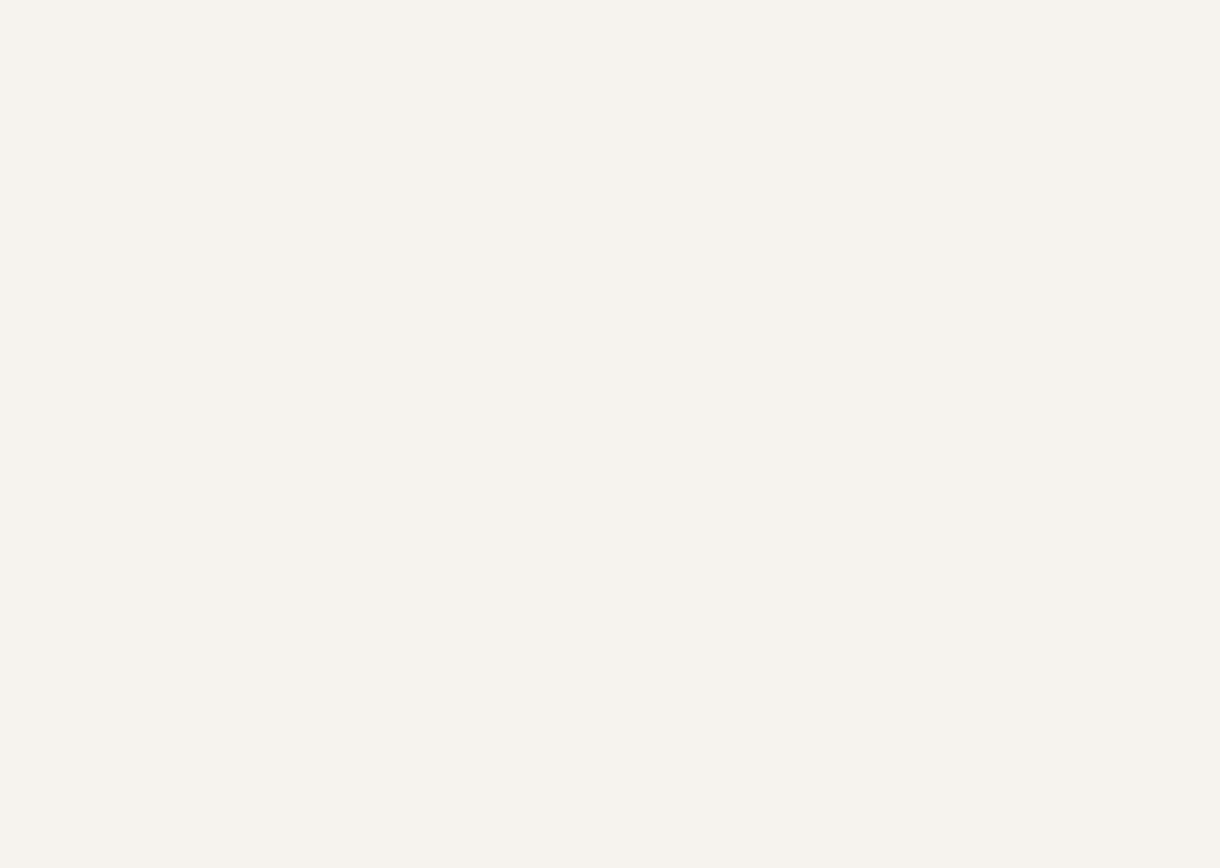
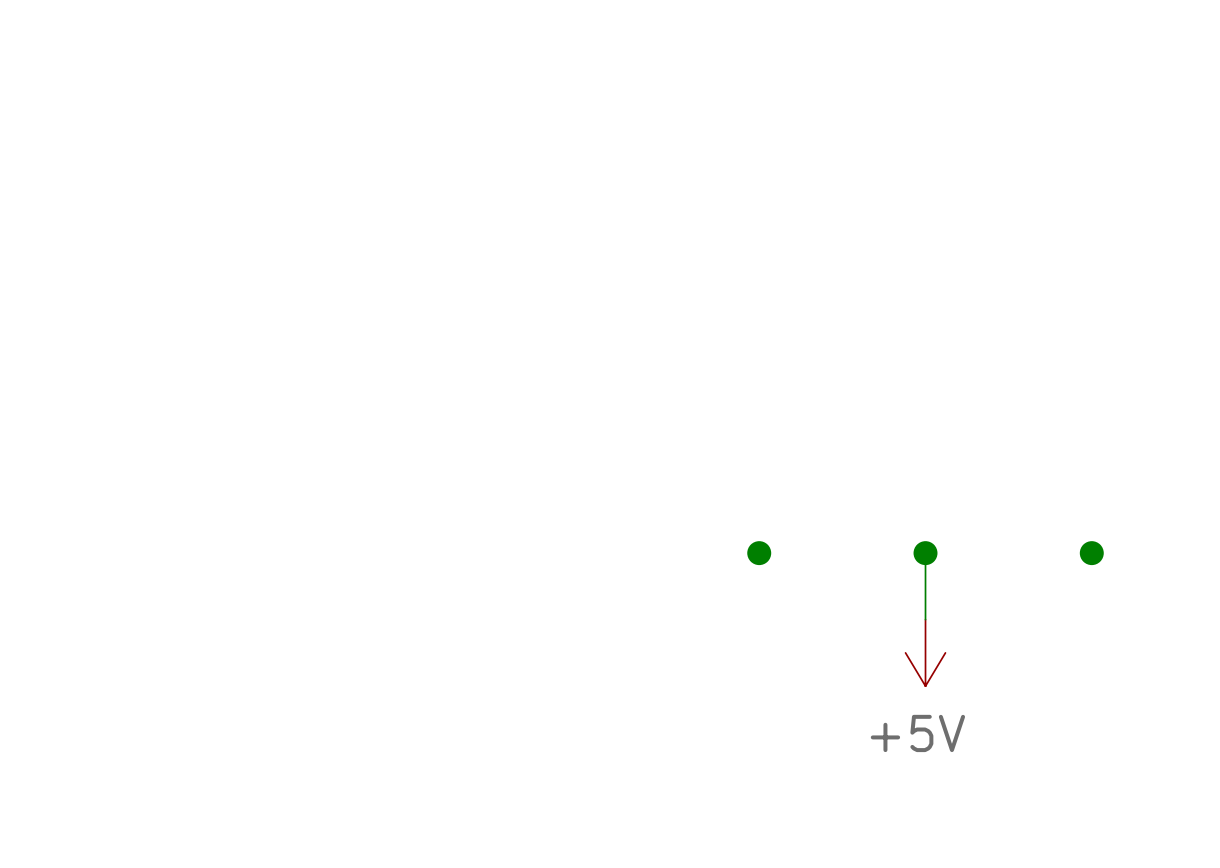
junction: none -> (759, 553)
wire: none -> (925, 553) (925, 619)
junction: none -> (925, 553)
junction: none -> (1091, 553)
power symbol: none -> +5V (925, 652)

